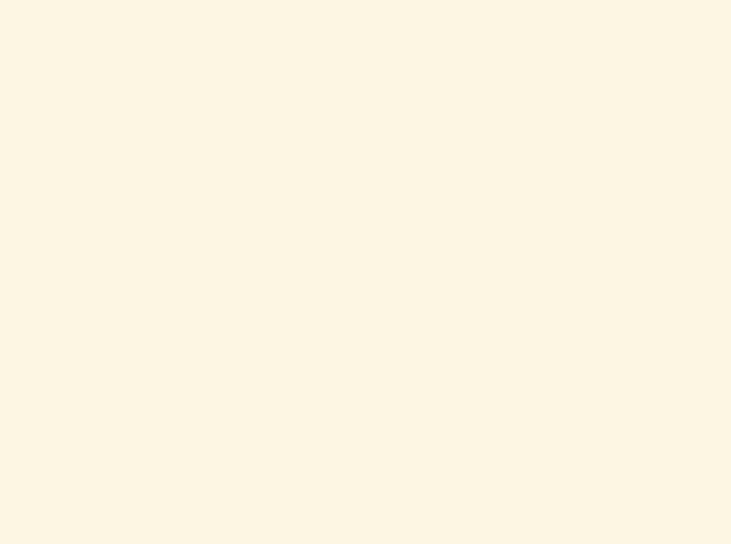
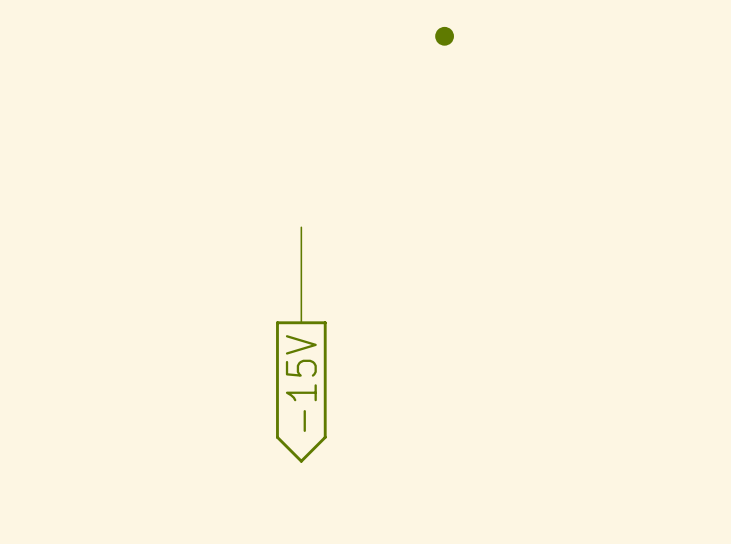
junction: none -> (444, 36)
wire: none -> (301, 227) (301, 322)
power symbol: none -> (301, 392)

